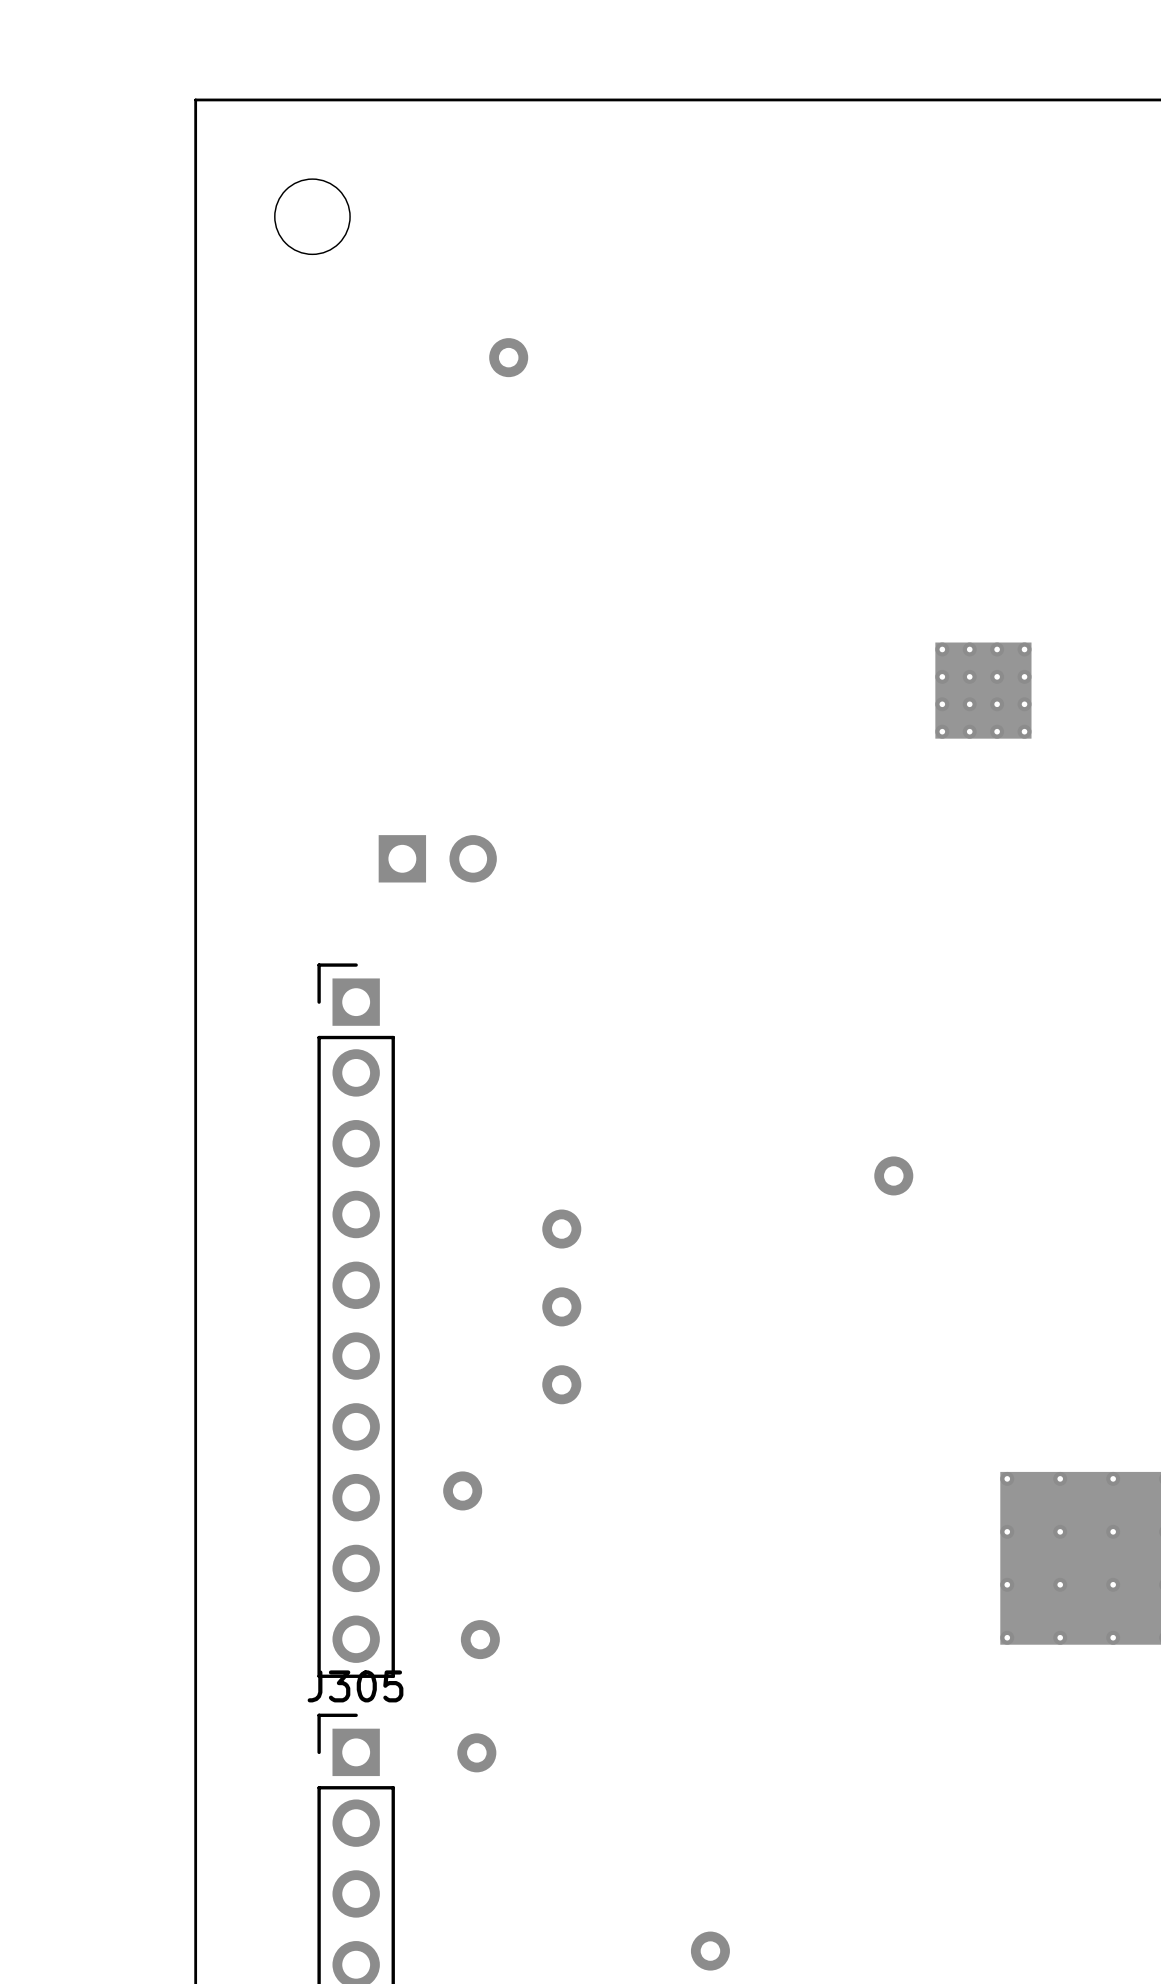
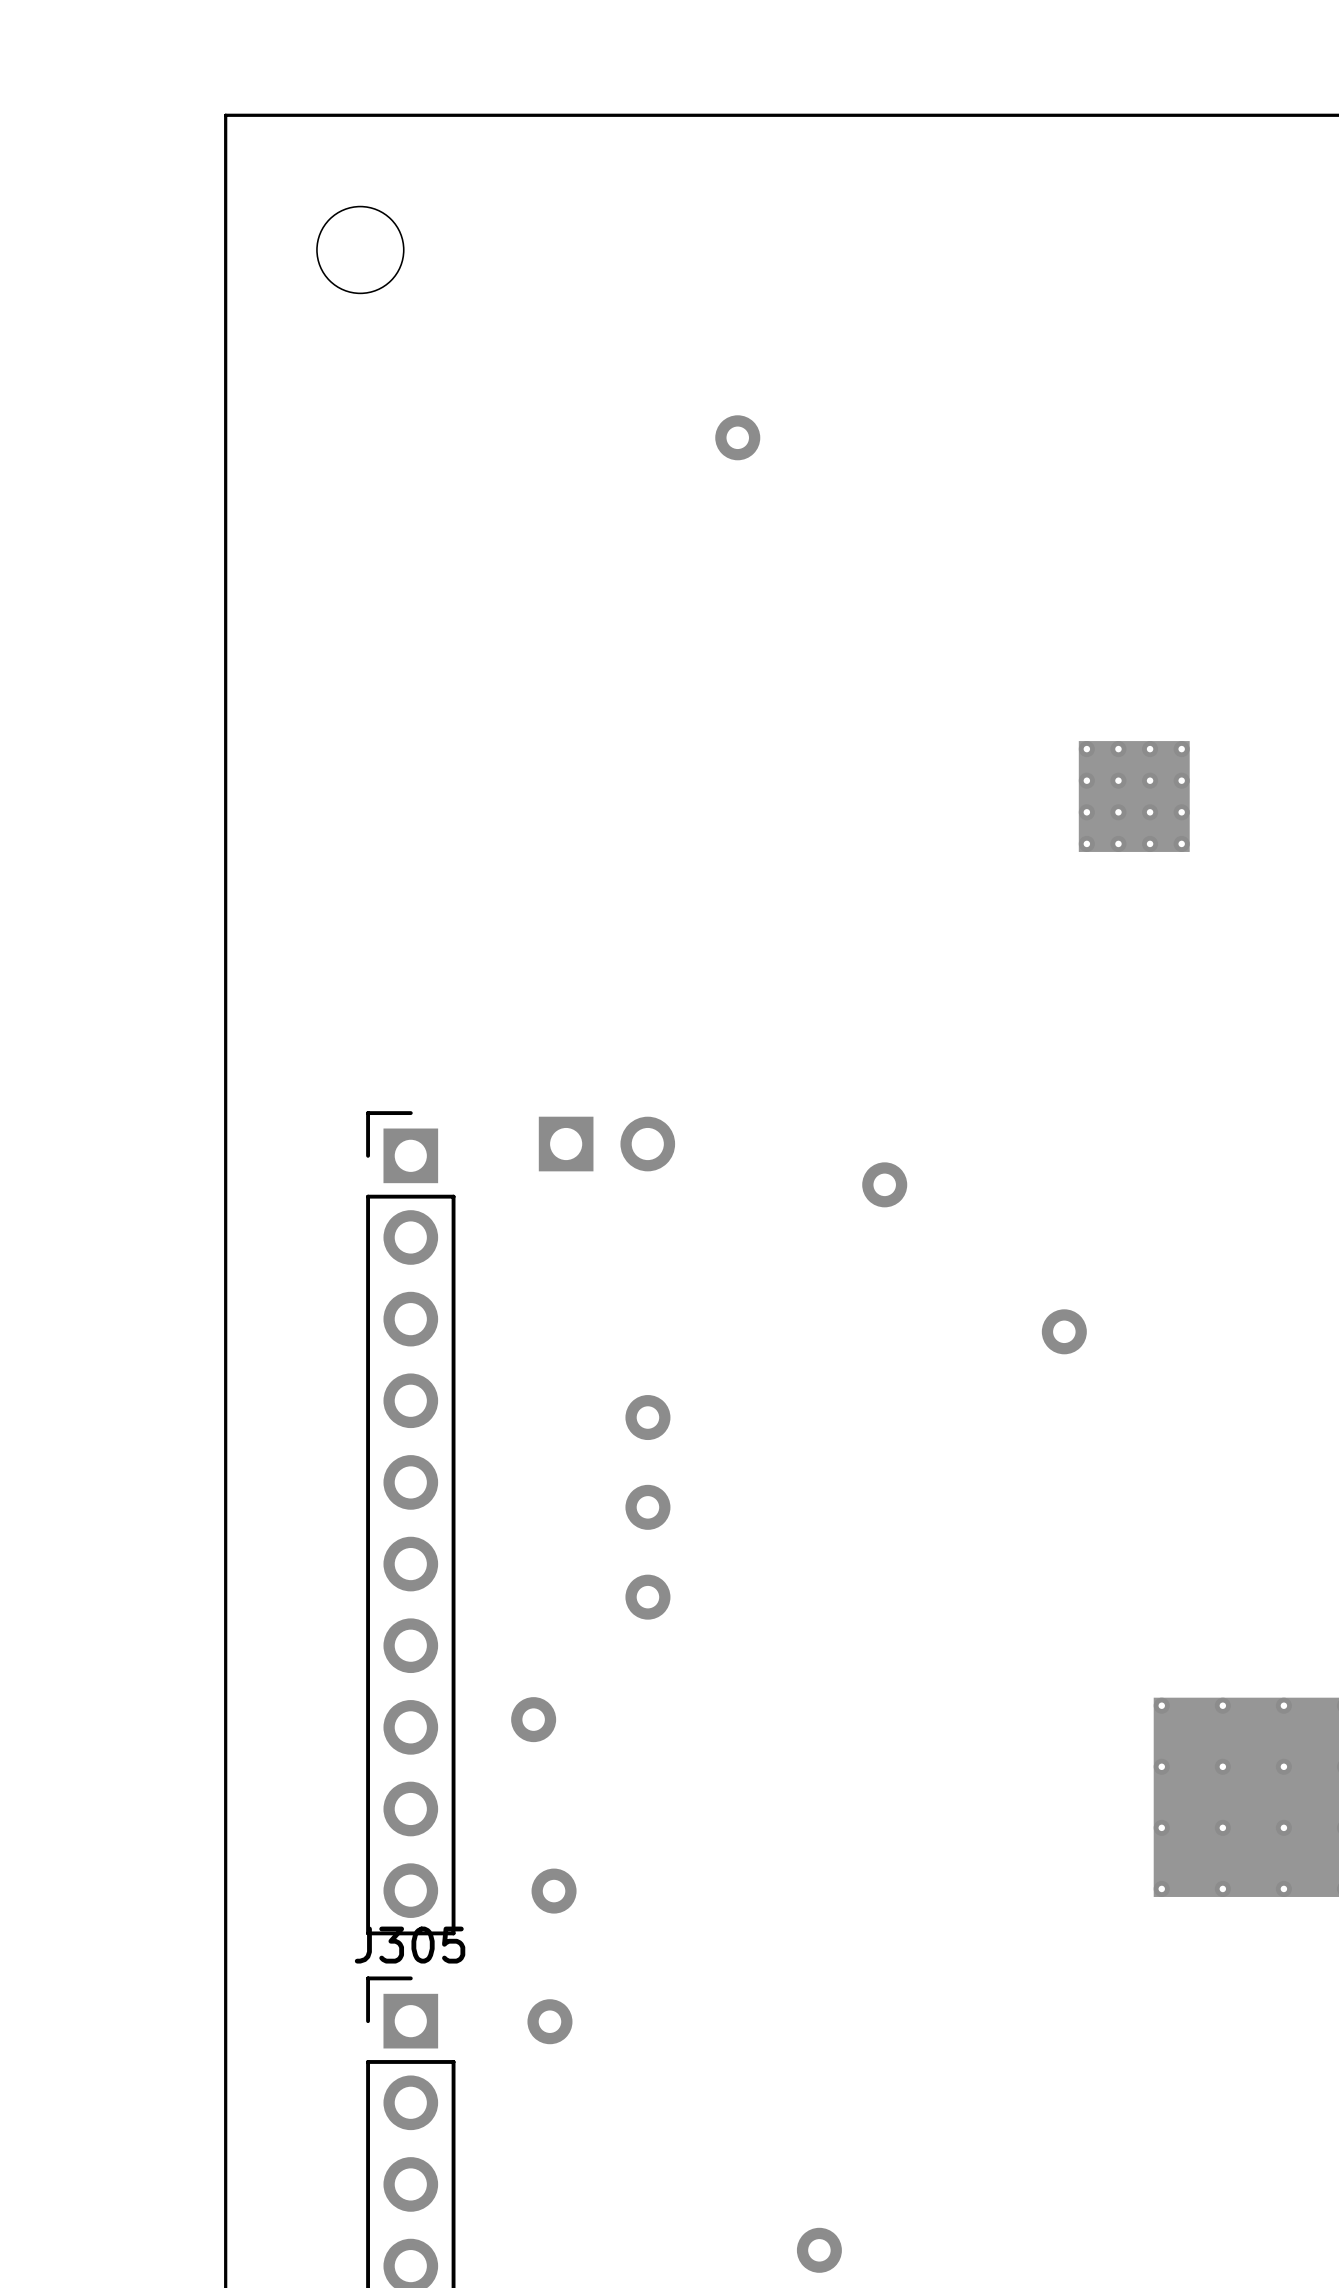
part position: (508, 357) -> (737, 437)
part position: (437, 858) -> (606, 1144)
part: none -> (884, 1184)
part position: (893, 1175) -> (1064, 1331)

